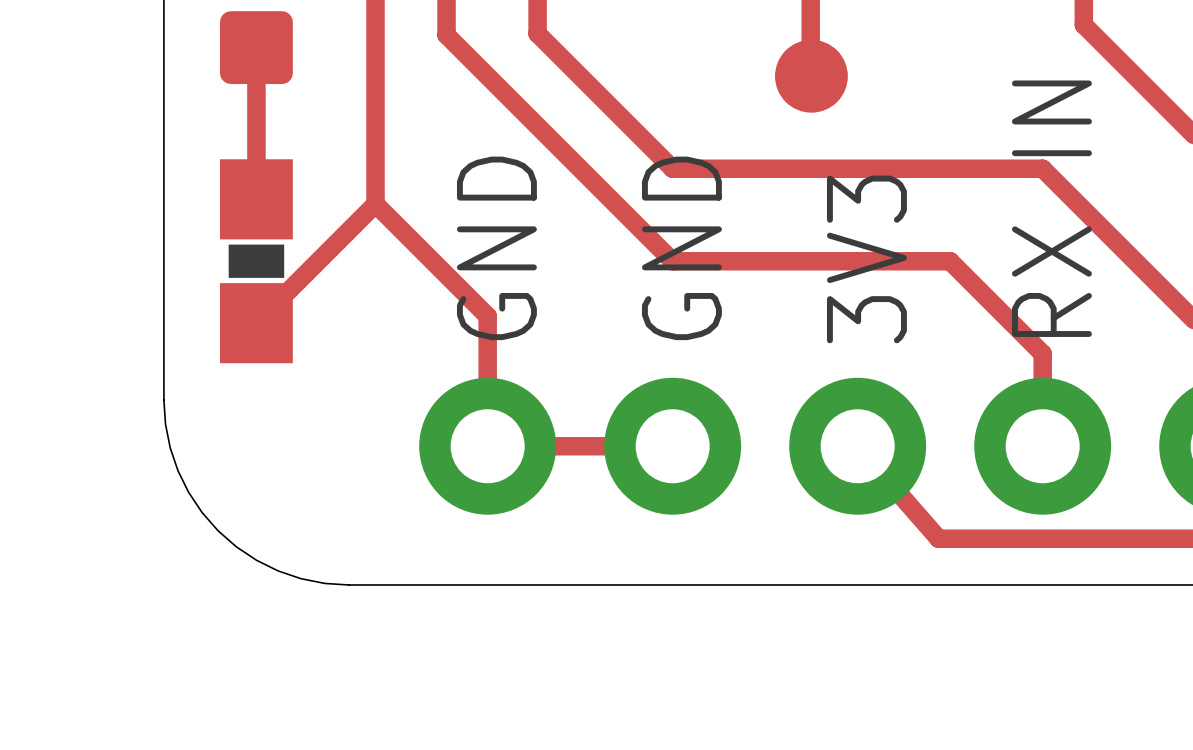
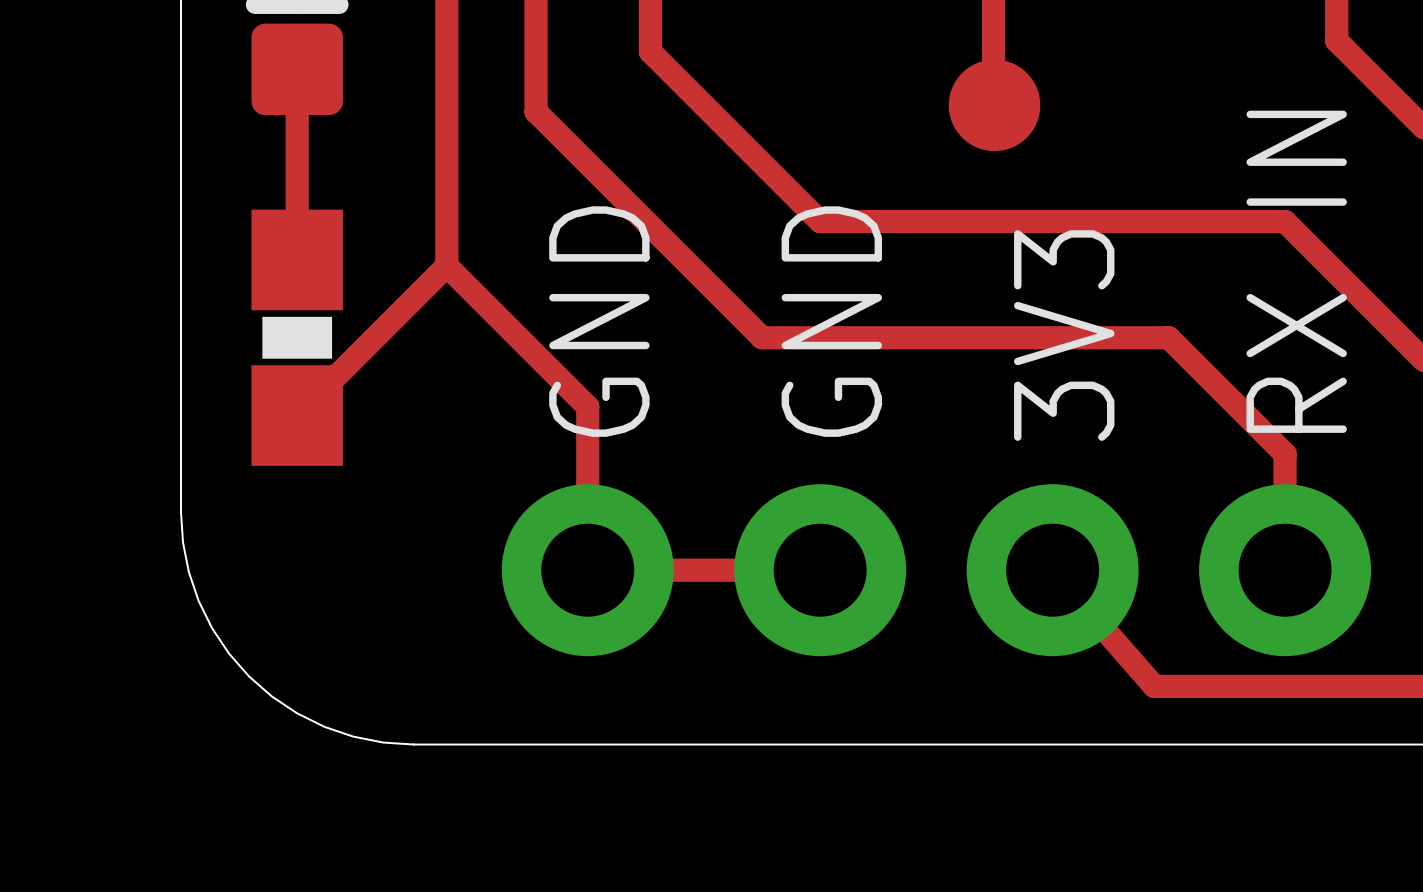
top track: (446, 35) (672, 261) -> (536, 53) (536, 111) (762, 337) (820, 337)

